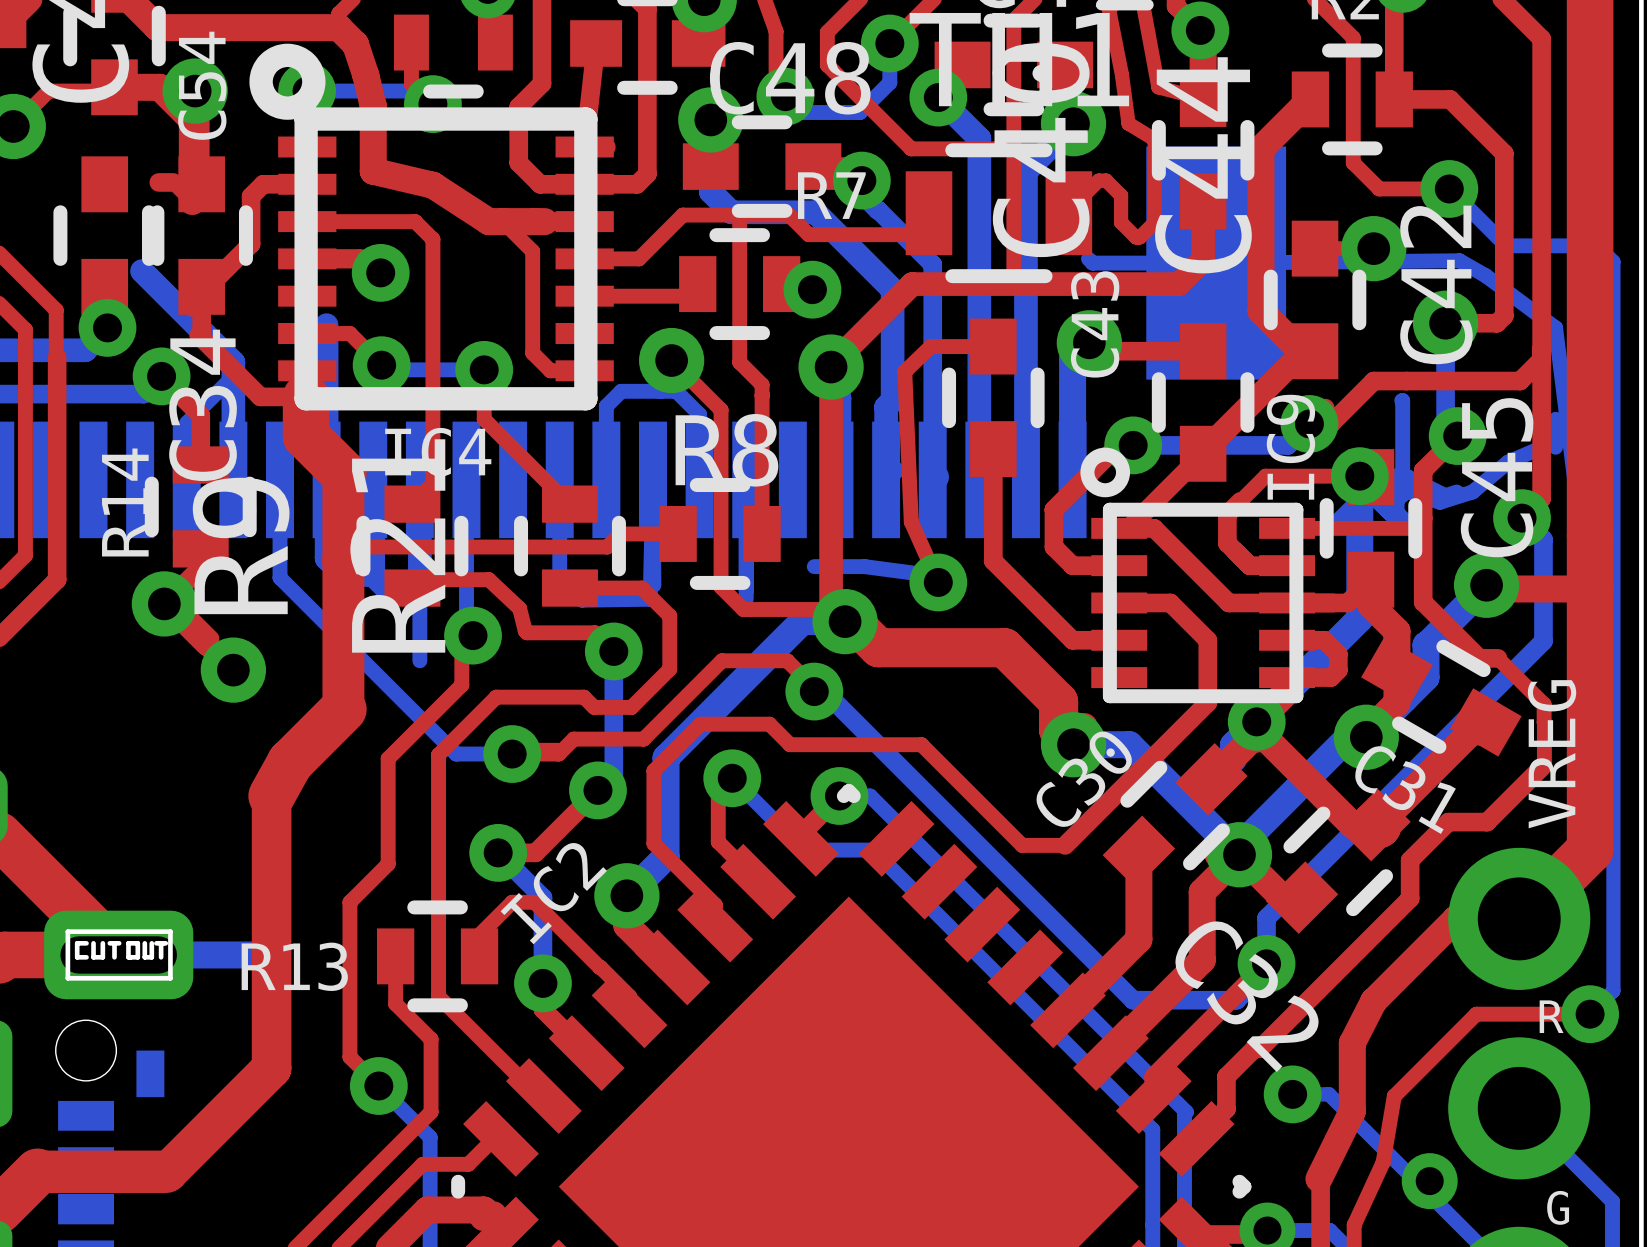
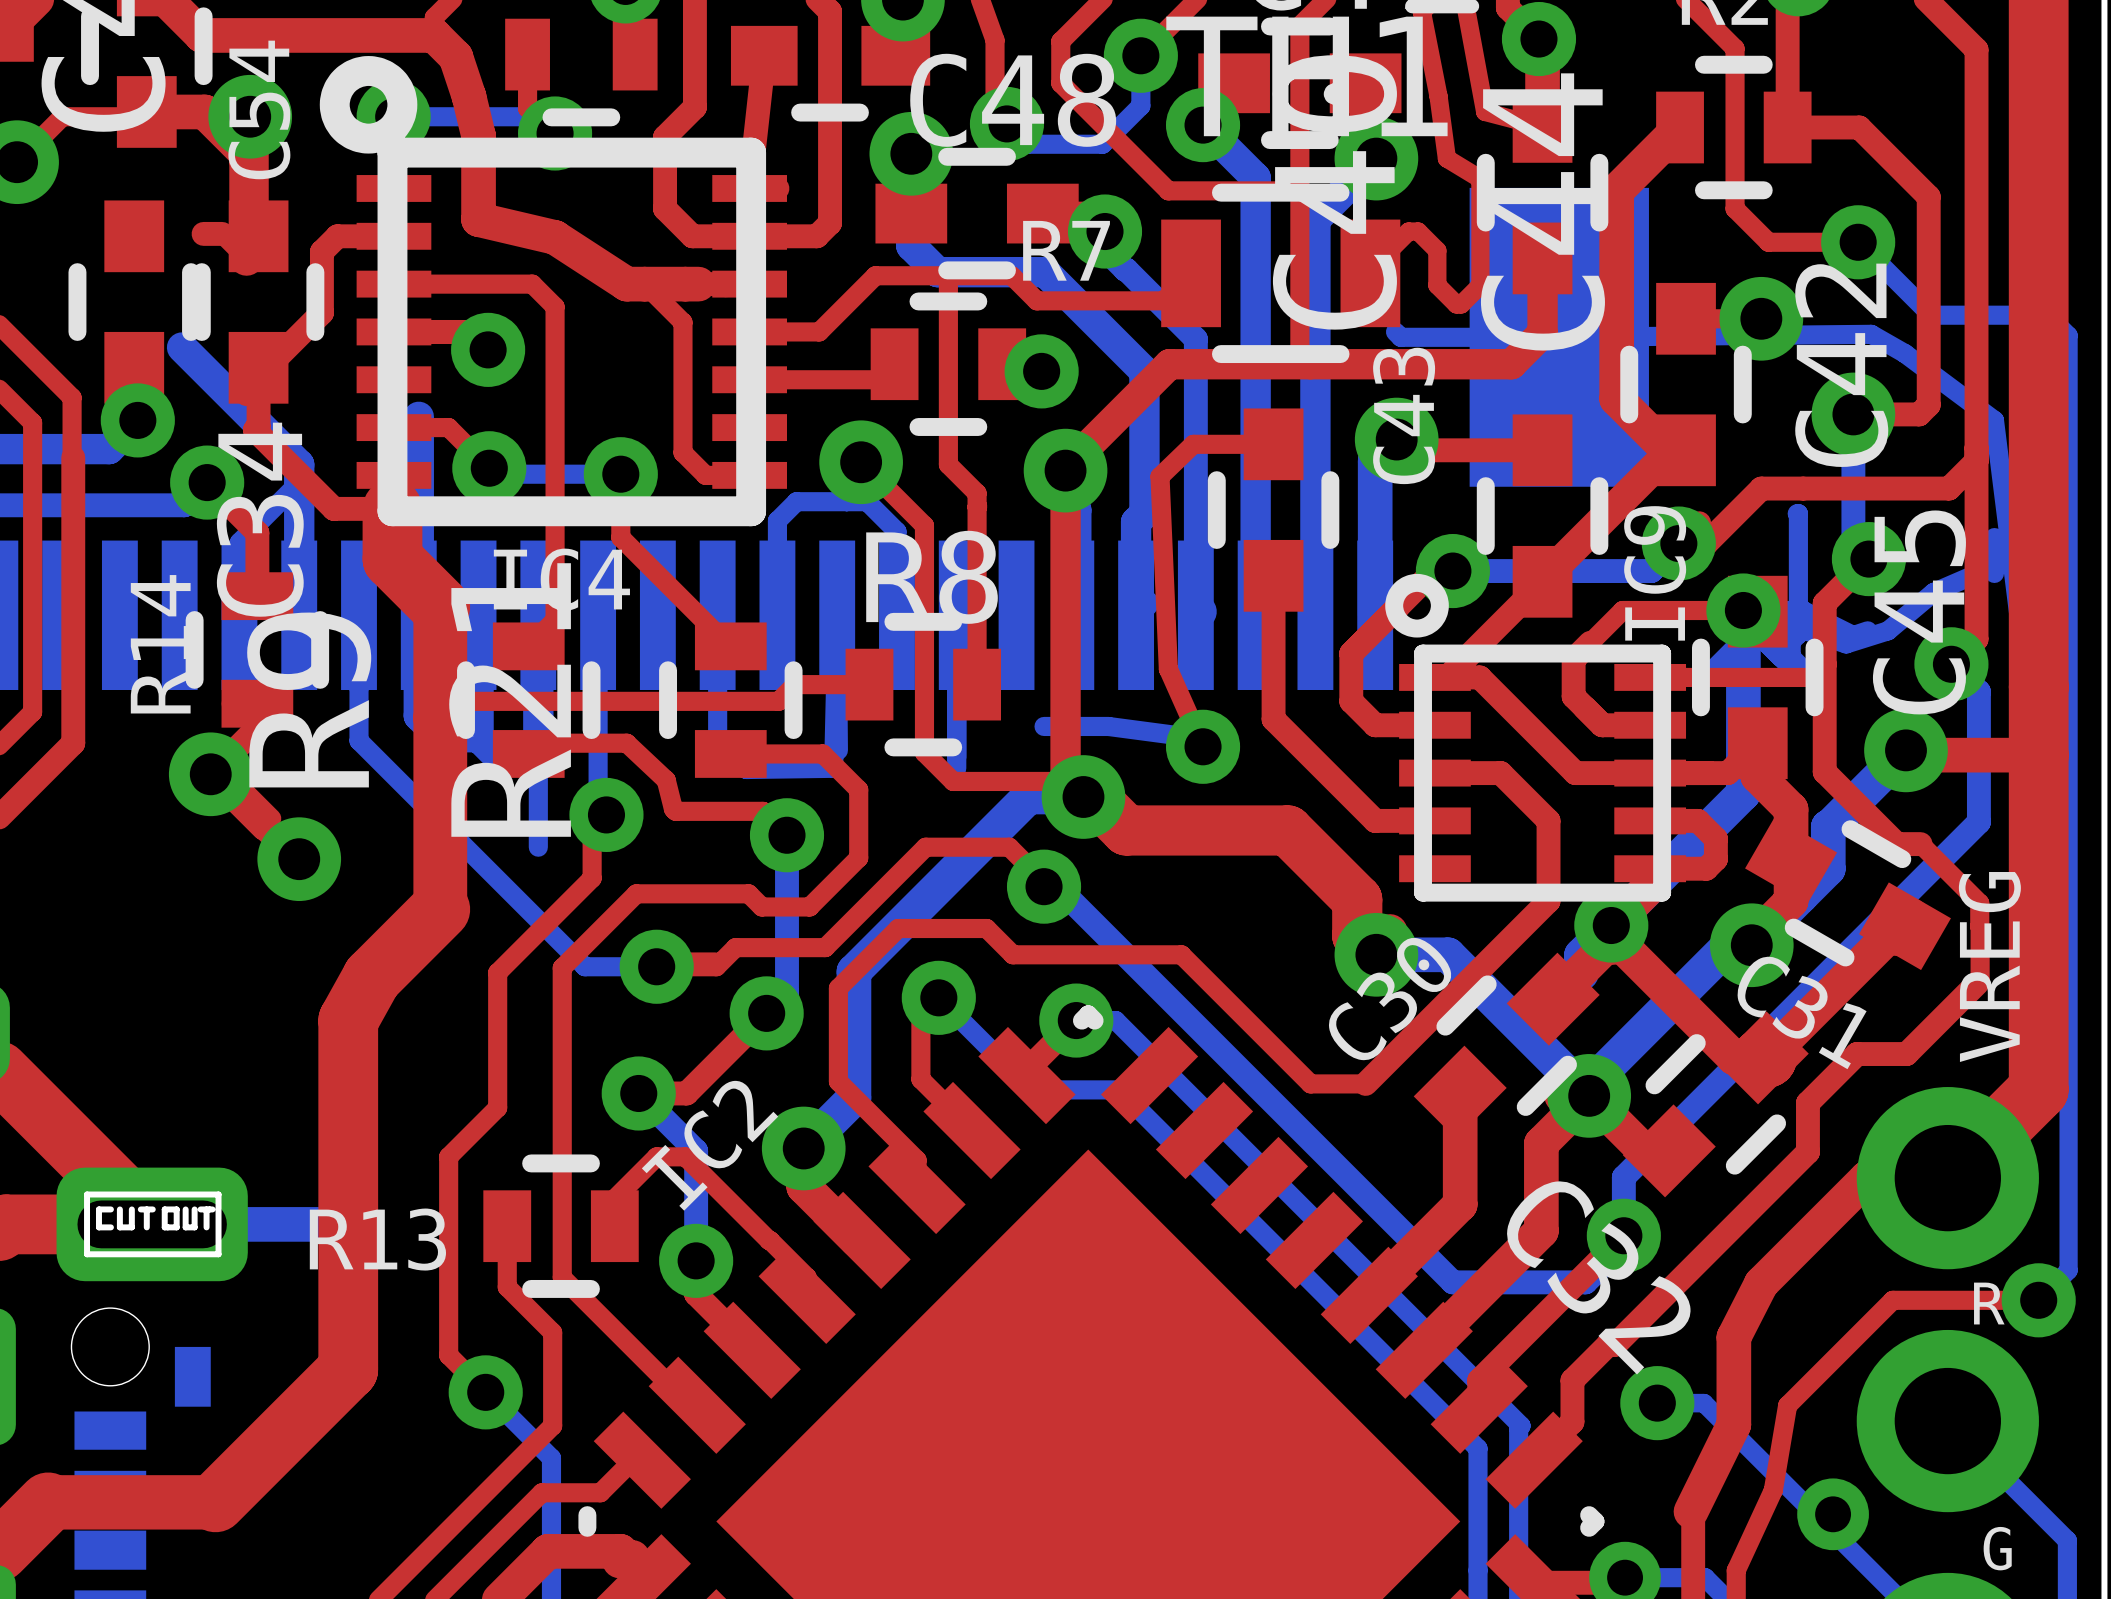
top track width: thin (271, 795) (271, 1068) (168, 1171) -> thick (348, 1020) (348, 1369) (215, 1502)

